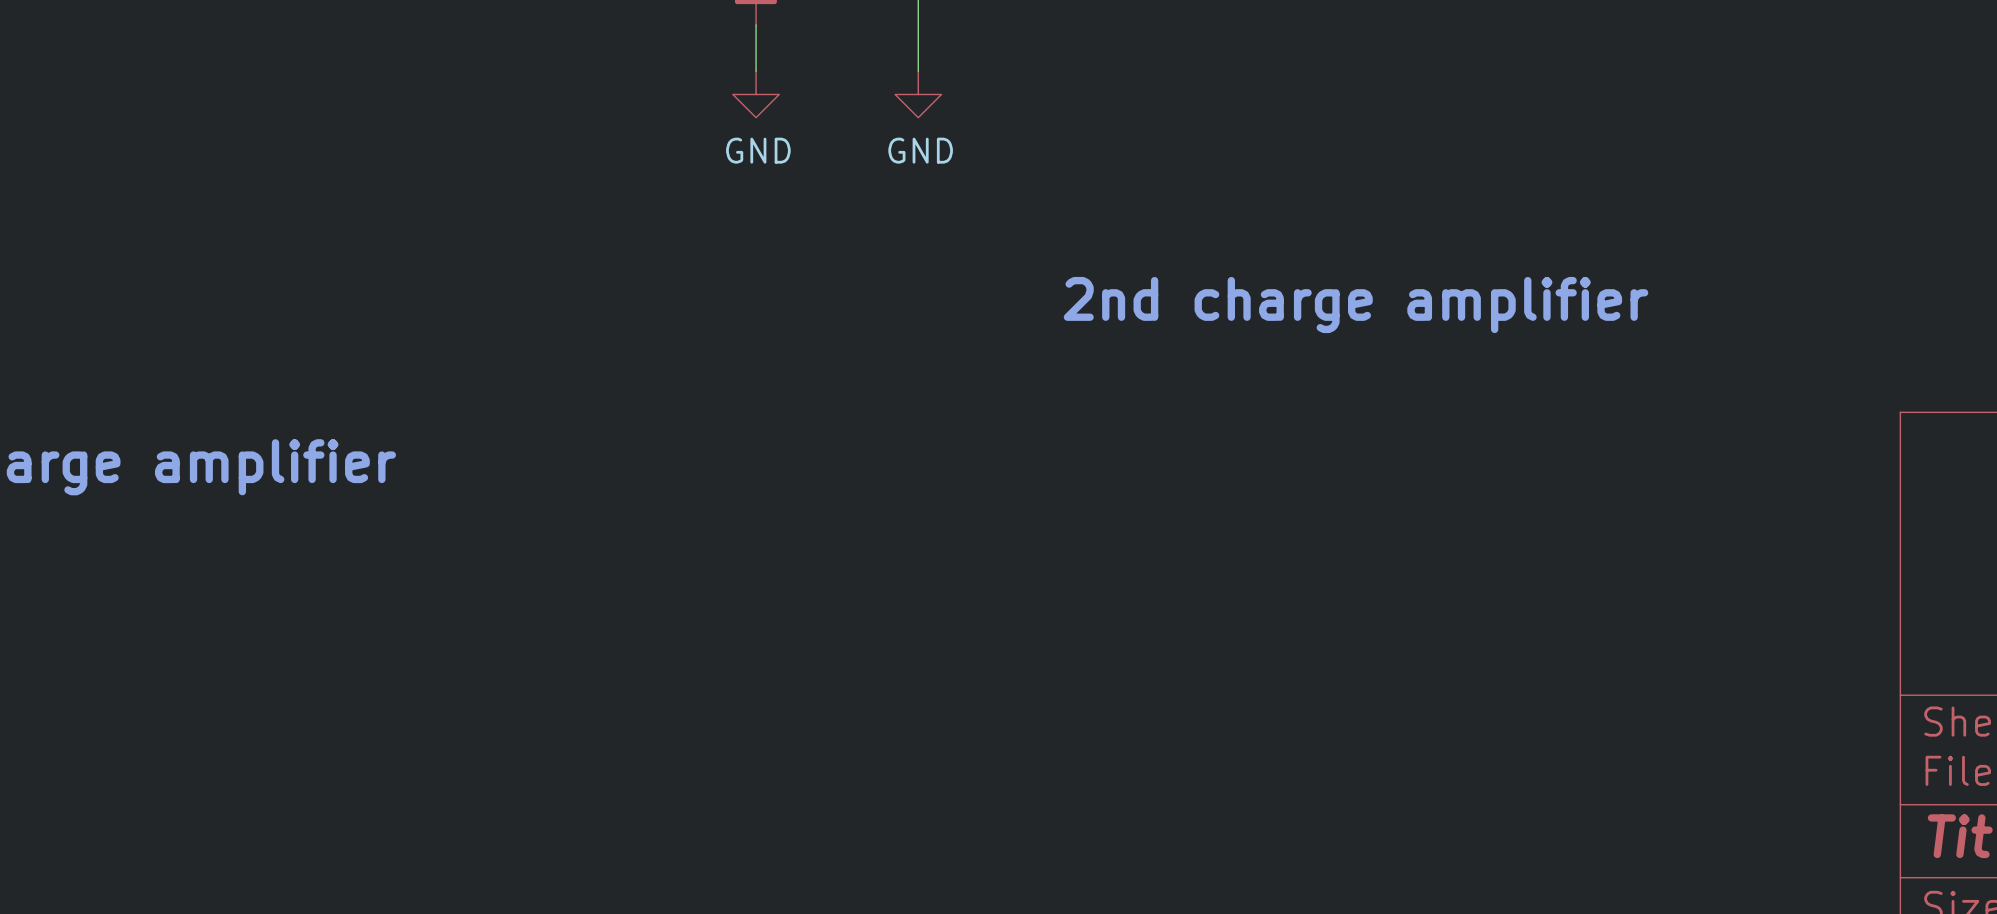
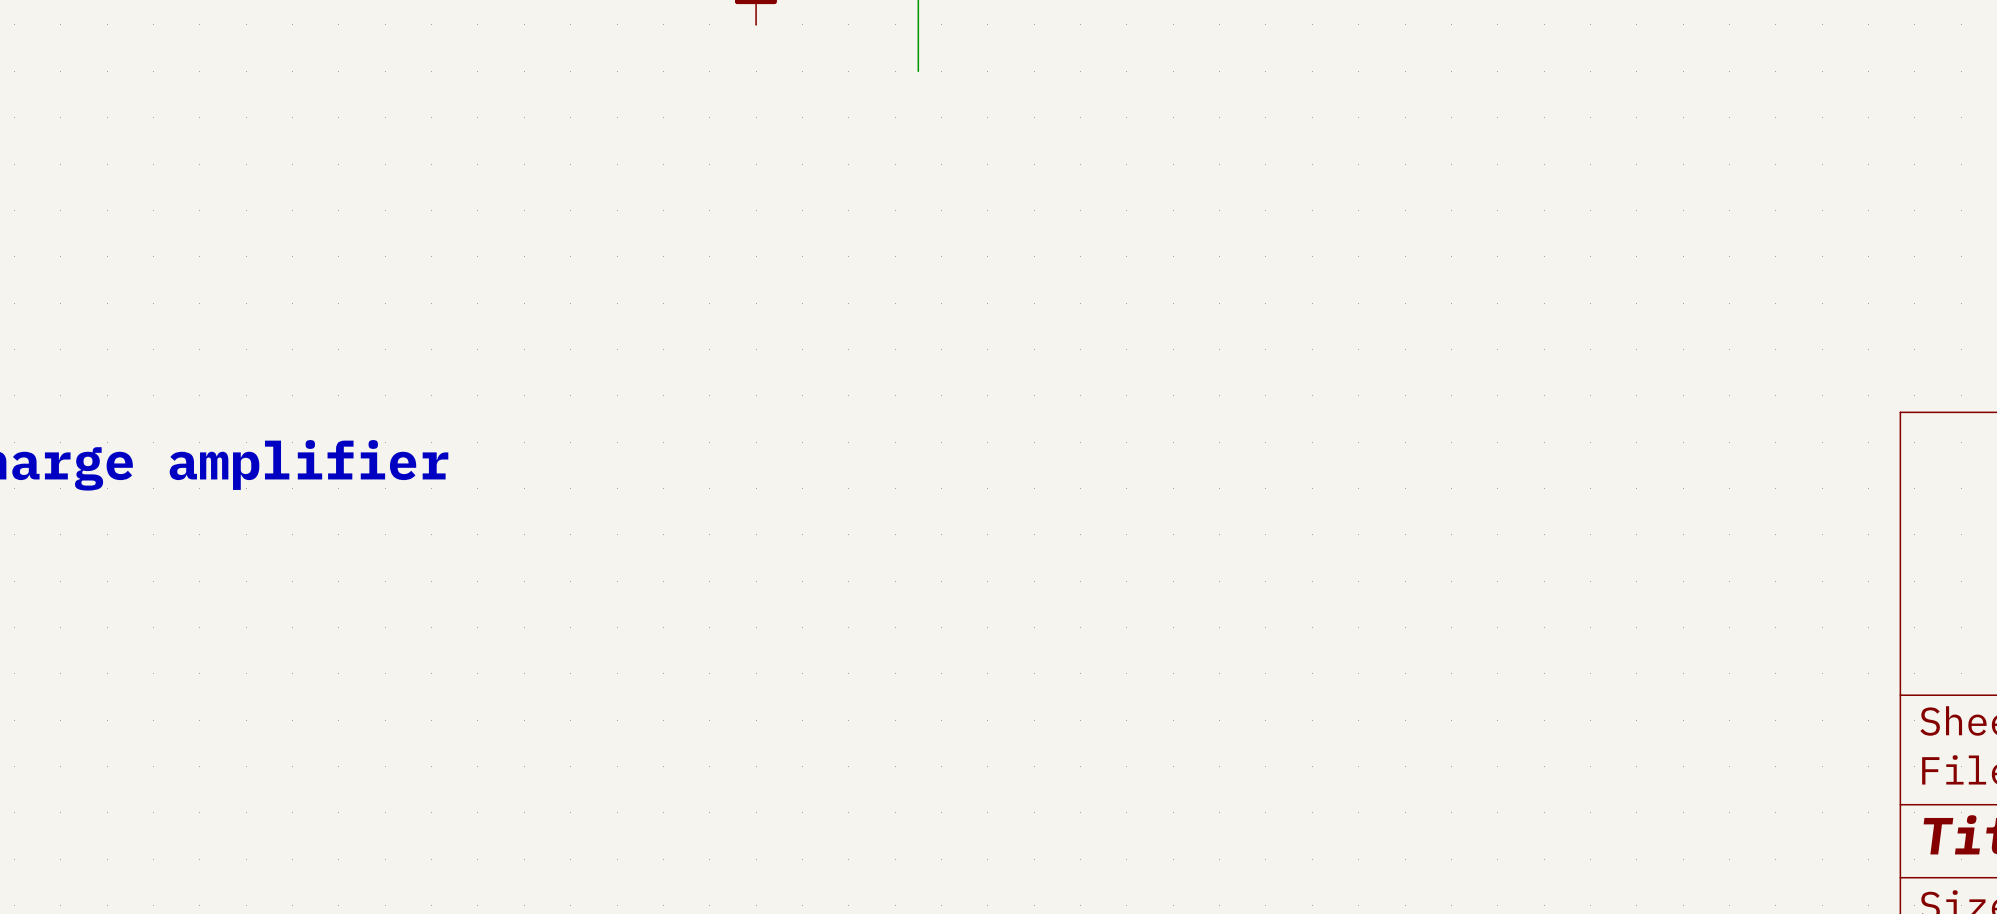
wire: (756, 24) (756, 71) -> none
power symbol: GND (756, 94) -> none
power symbol: GND (918, 94) -> none
text: 2nd charge amplifier (1356, 305) -> none

